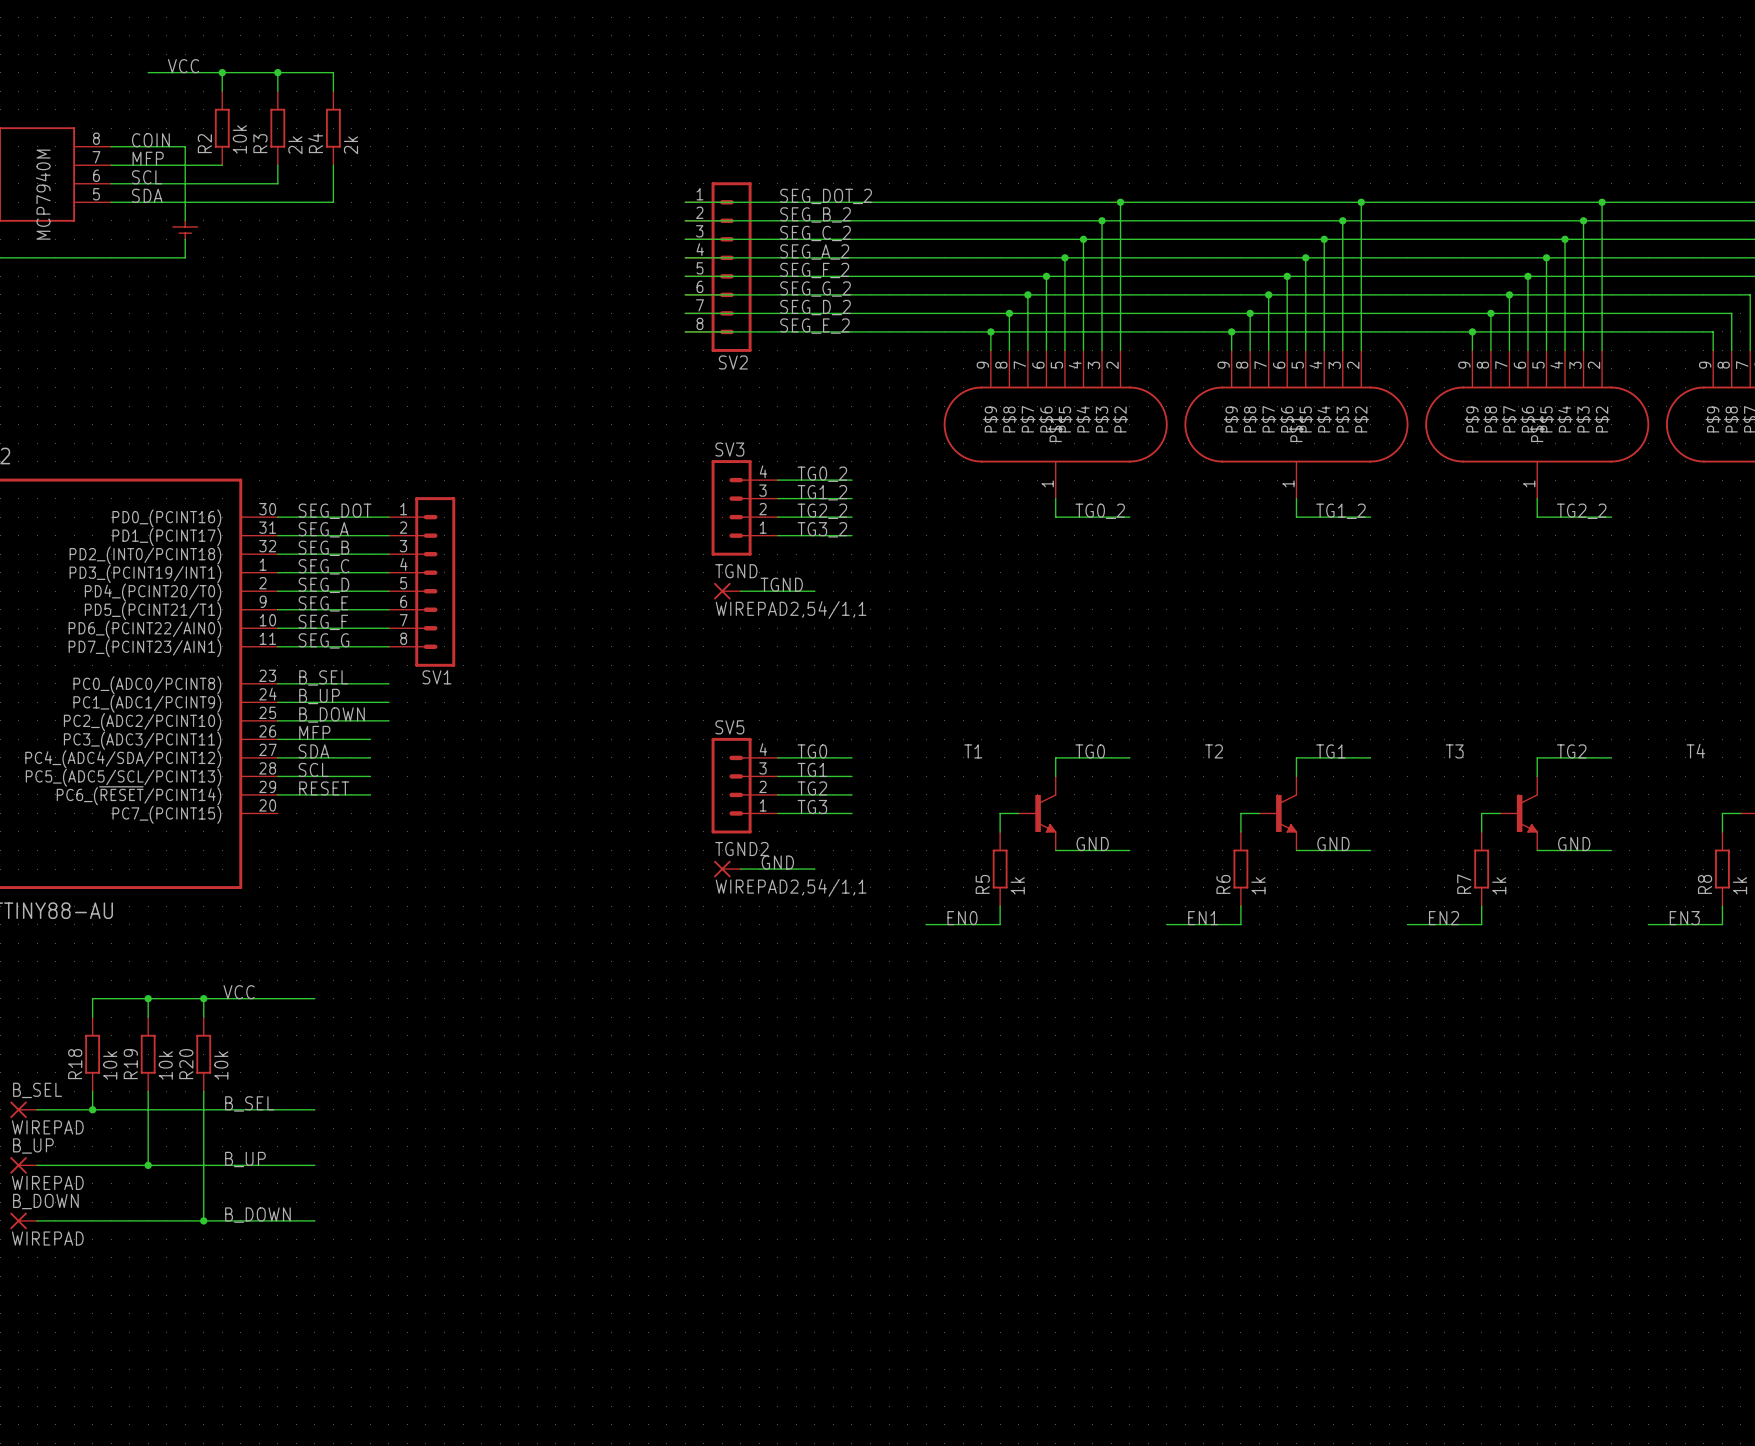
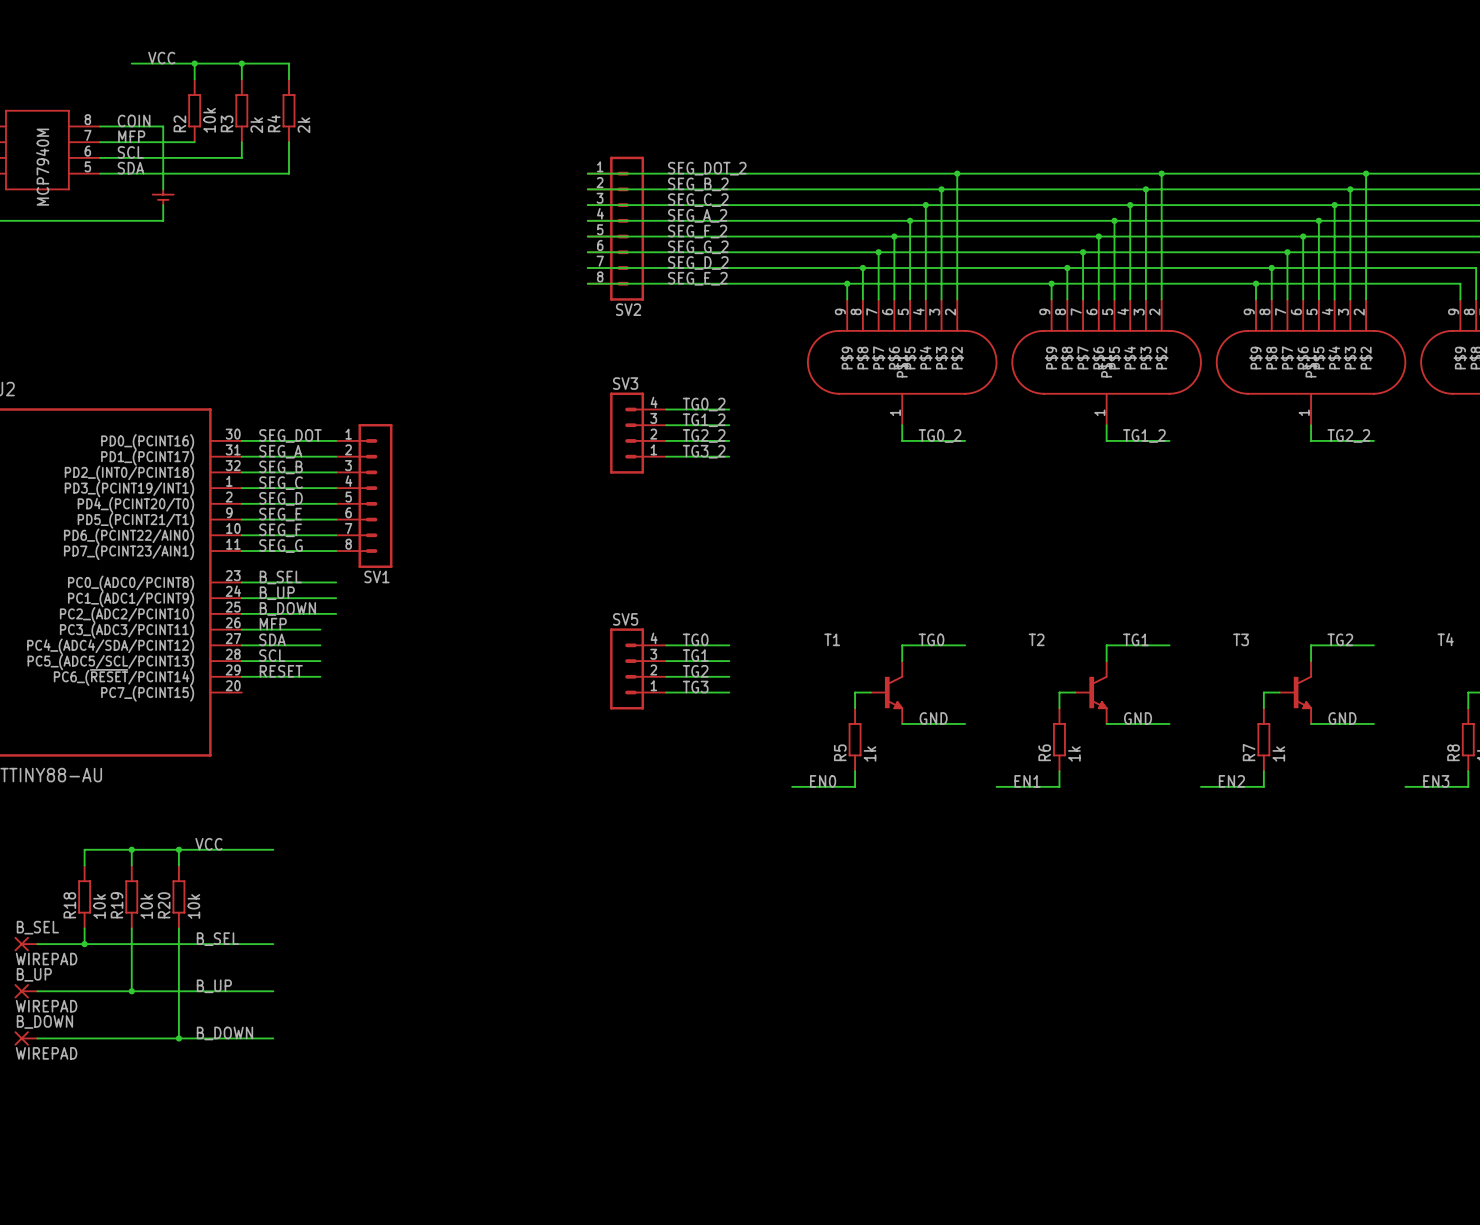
label: TGND (781, 584) -> none
TGND: WIREPAD2,54/1,1 (727, 591) -> none
wire: (740, 591) (814, 591) -> none
label: GND (777, 862) -> none
TGND2: WIREPAD2,54/1,1 (727, 869) -> none
wire: (740, 869) (814, 869) -> none

